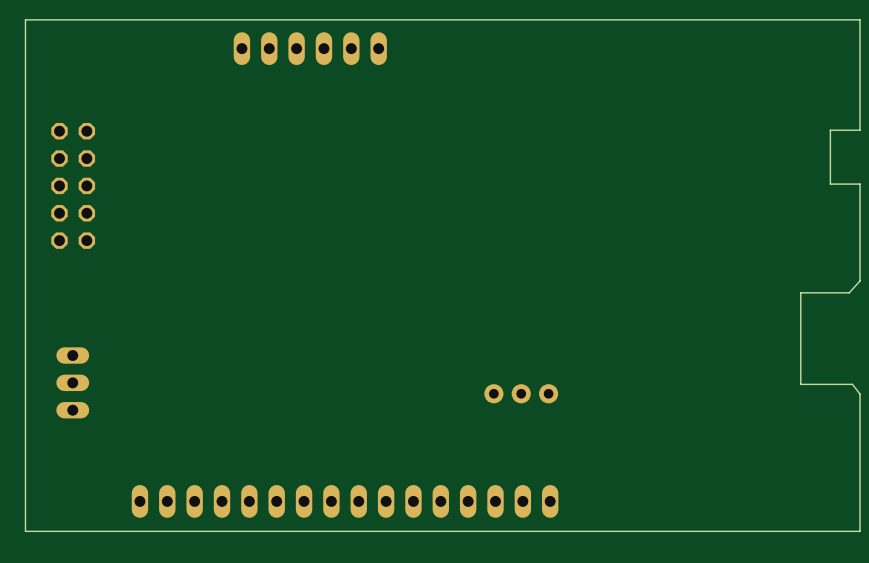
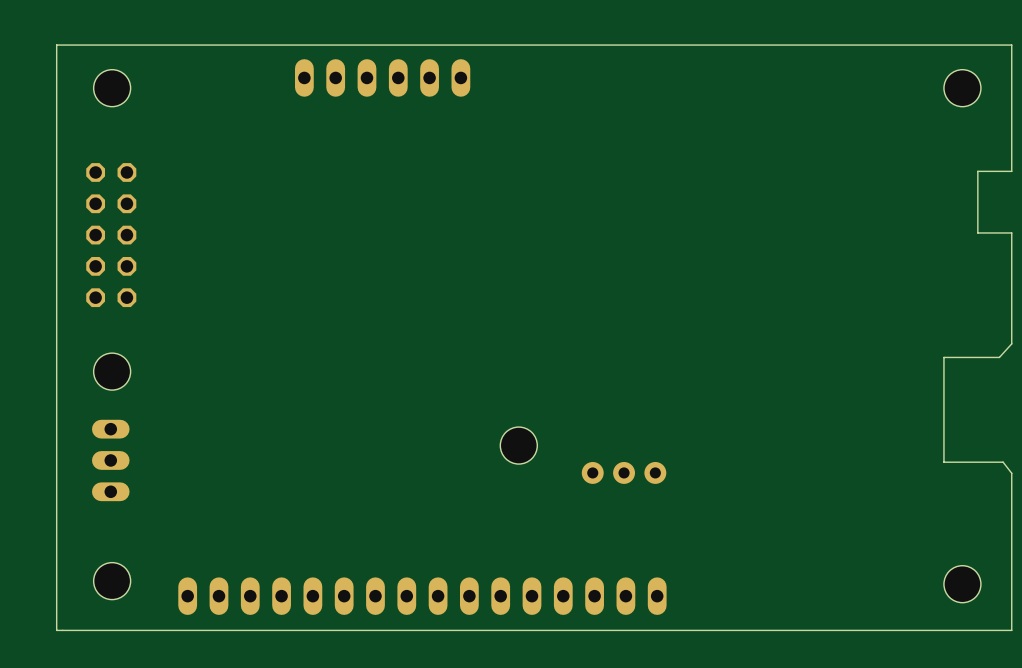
hole: none -> (112, 88)
hole: none -> (962, 88)
hole: none -> (112, 371)
hole: none -> (518, 445)
hole: none -> (112, 581)
hole: none -> (962, 584)

